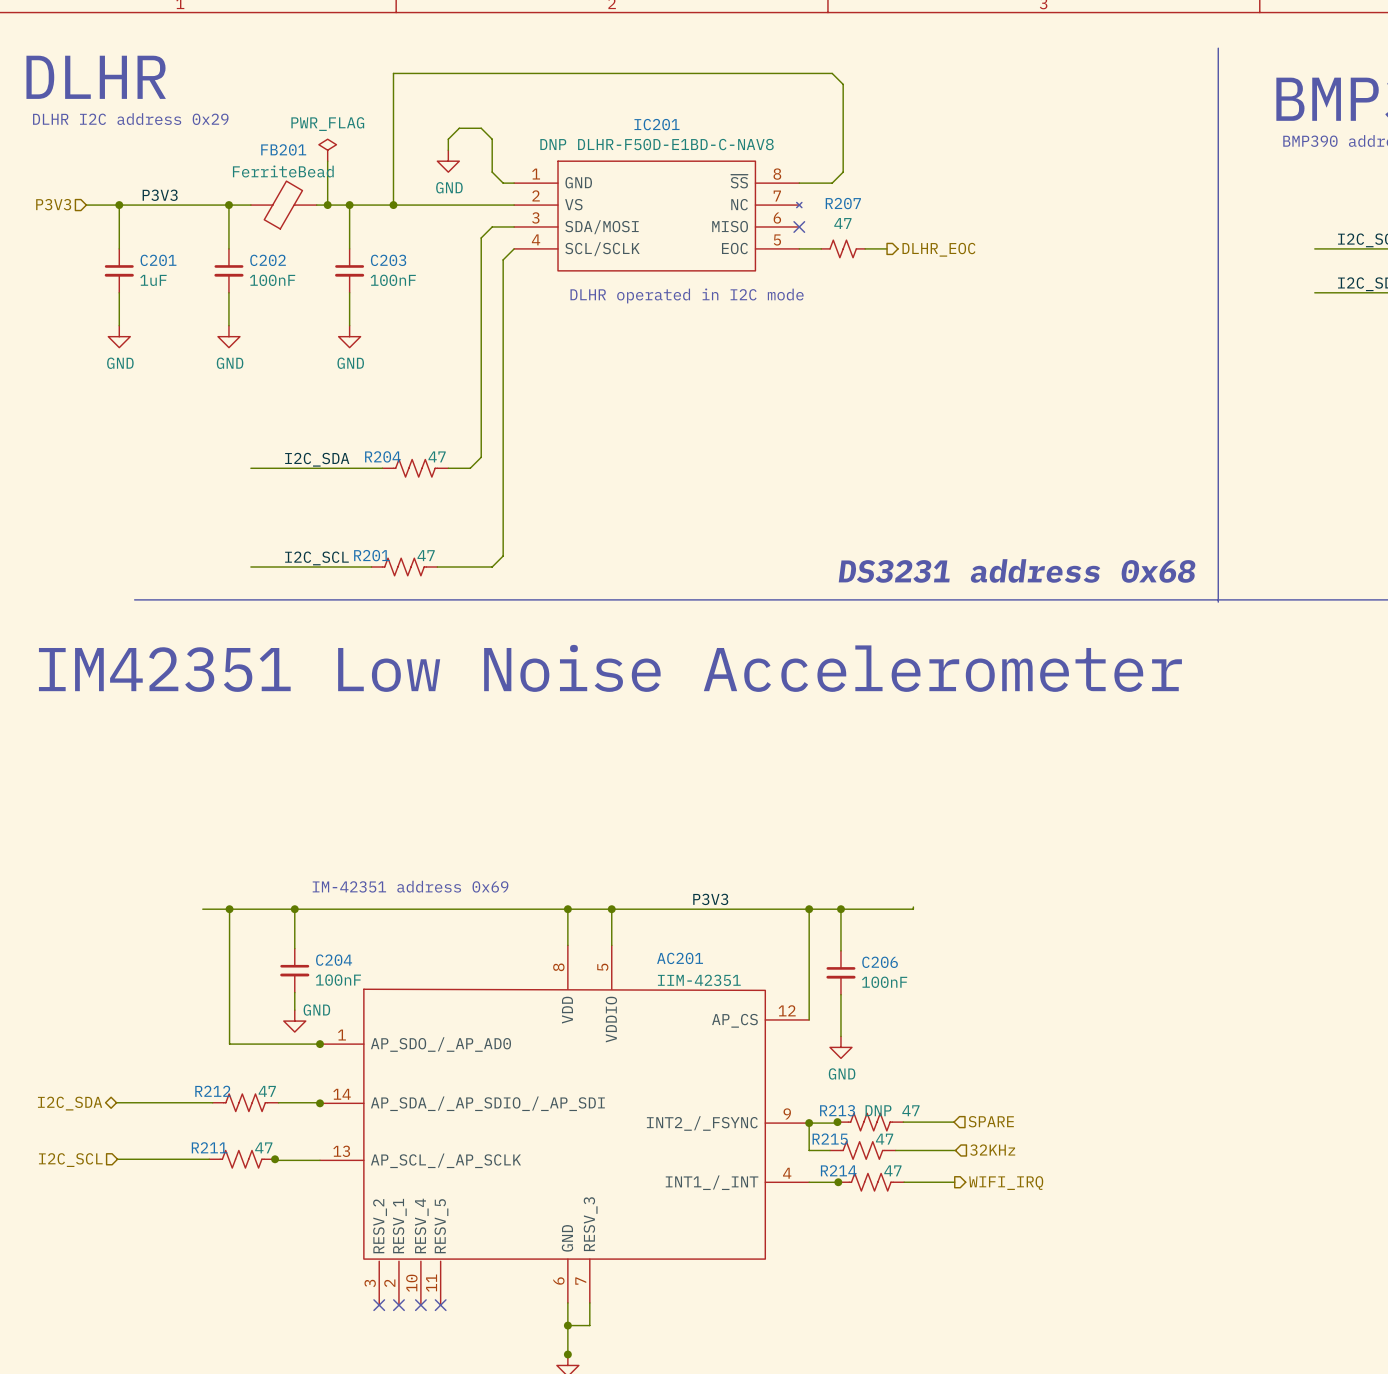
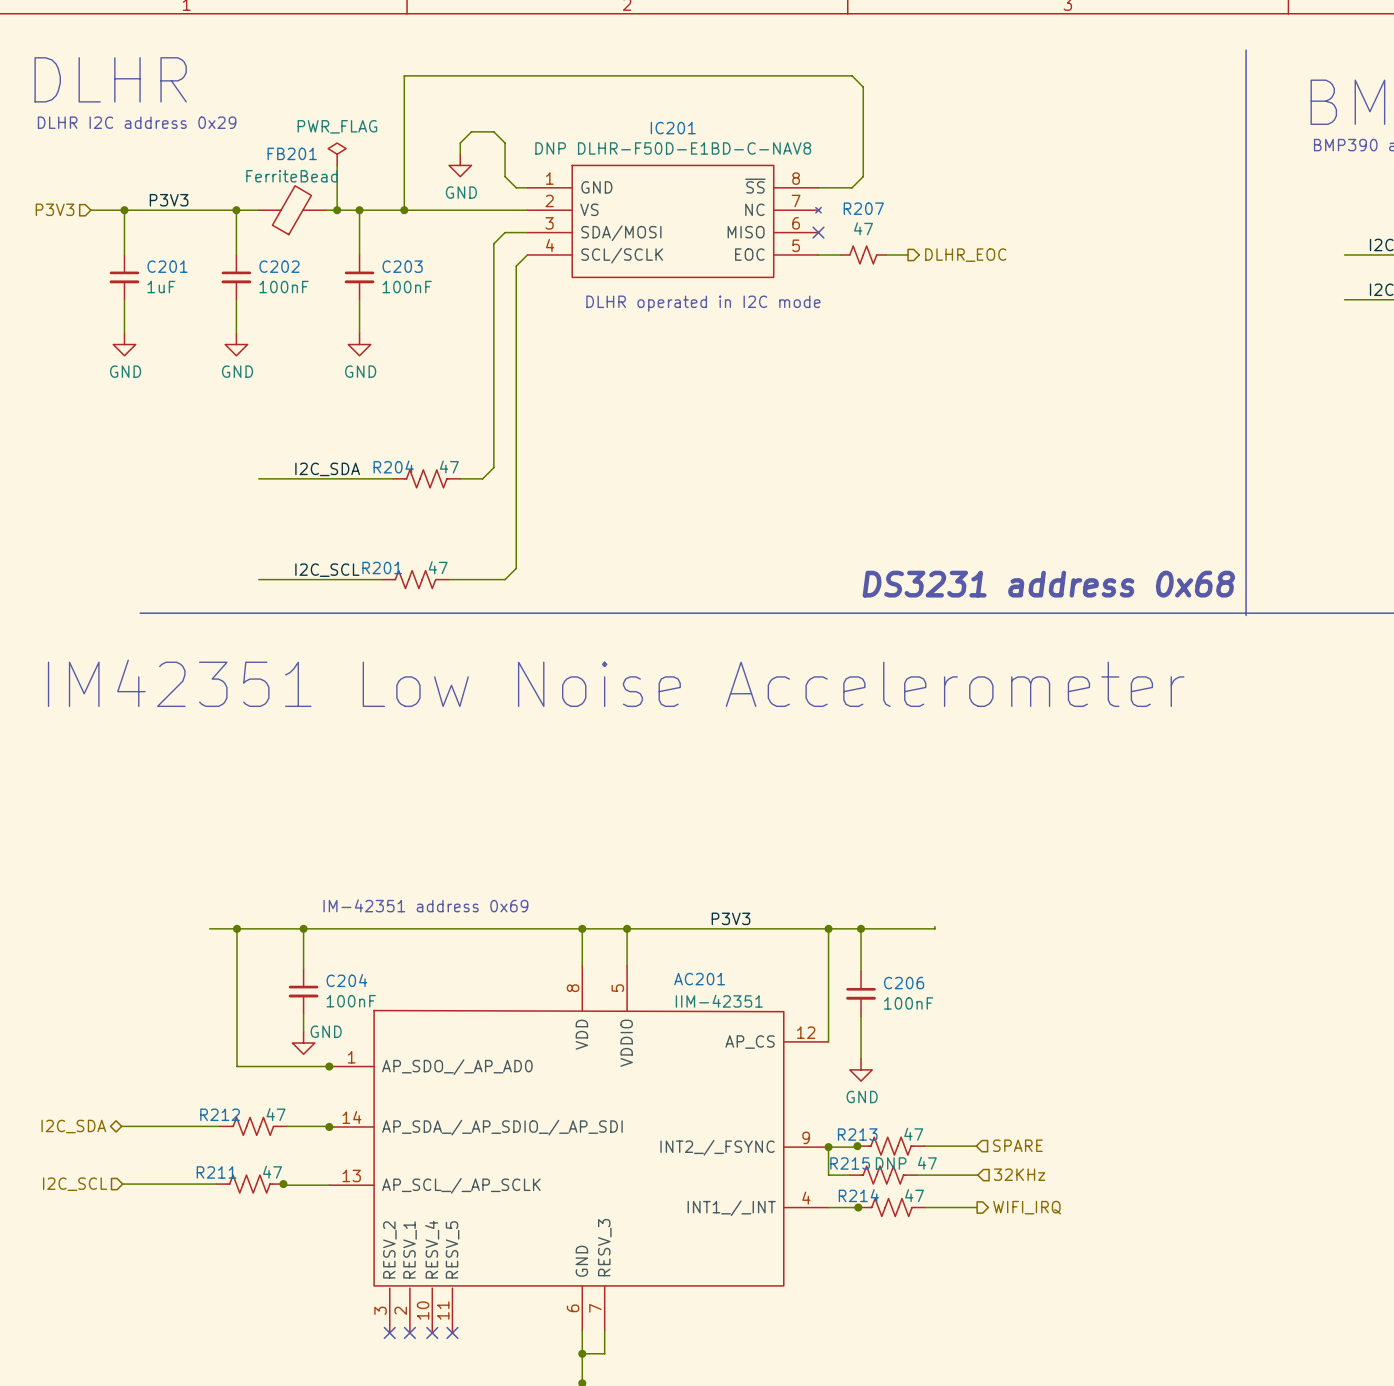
R213 value: DNP 47 (892, 1110) -> 47 (913, 1134)
R215 value: 47 (884, 1139) -> DNP 47 (906, 1163)

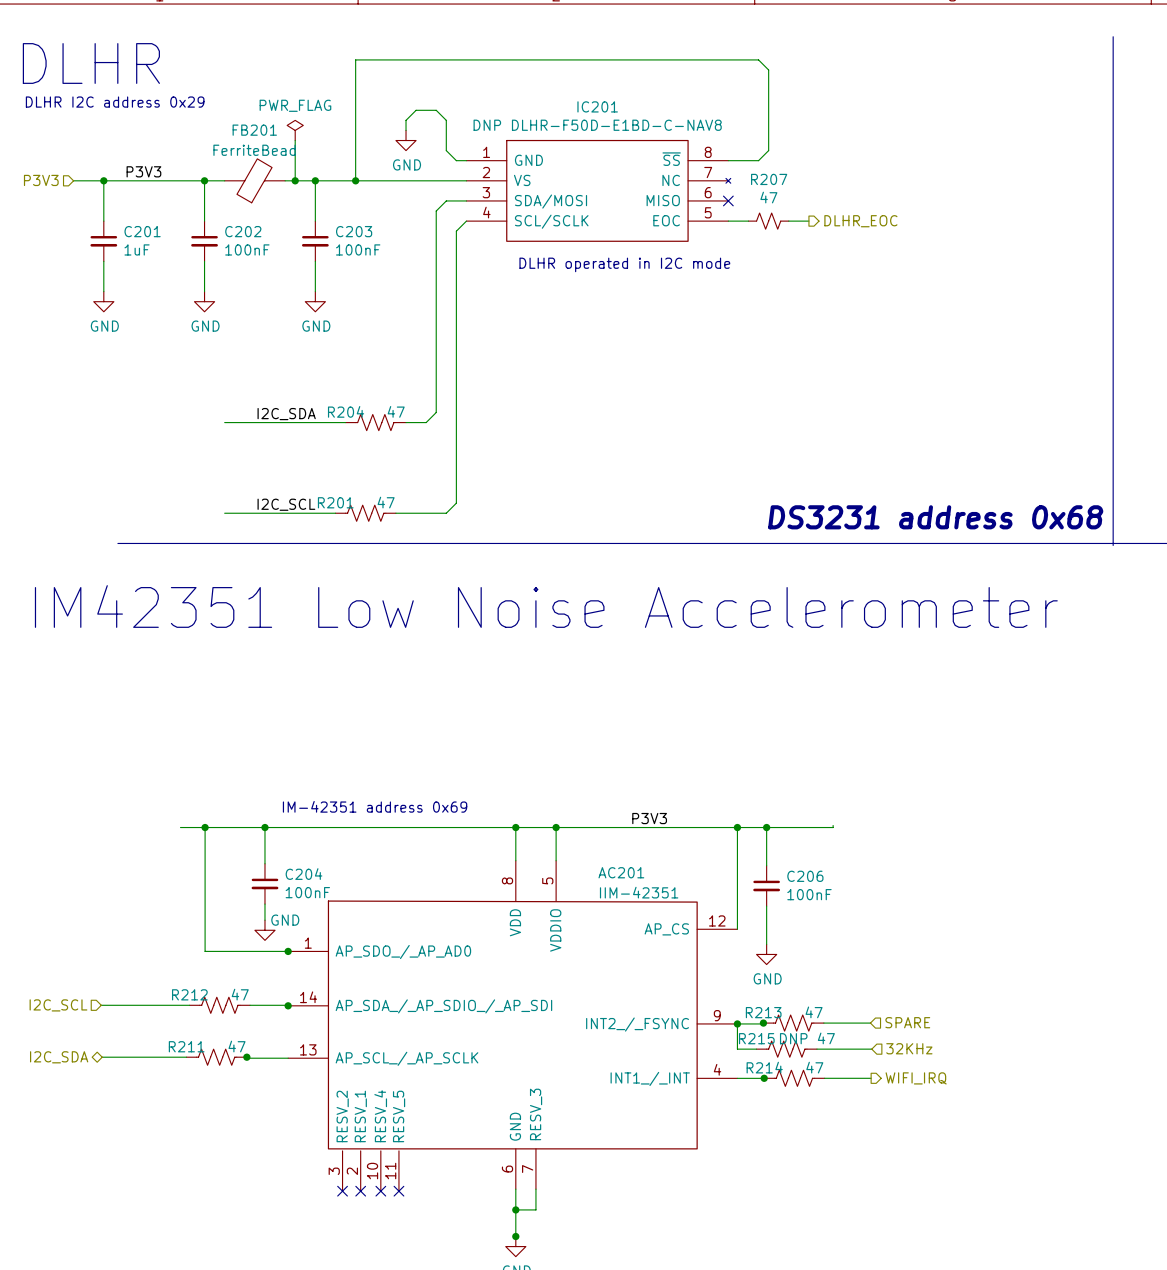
hierarchical label shape: bidirectional (73, 1126) -> input (58, 1005)
hierarchical label: I2C_SDA (73, 1126) -> I2C_SCL (58, 1005)
hierarchical label shape: input (75, 1184) -> bidirectional (59, 1057)
hierarchical label: I2C_SCL (75, 1184) -> I2C_SDA (59, 1057)

